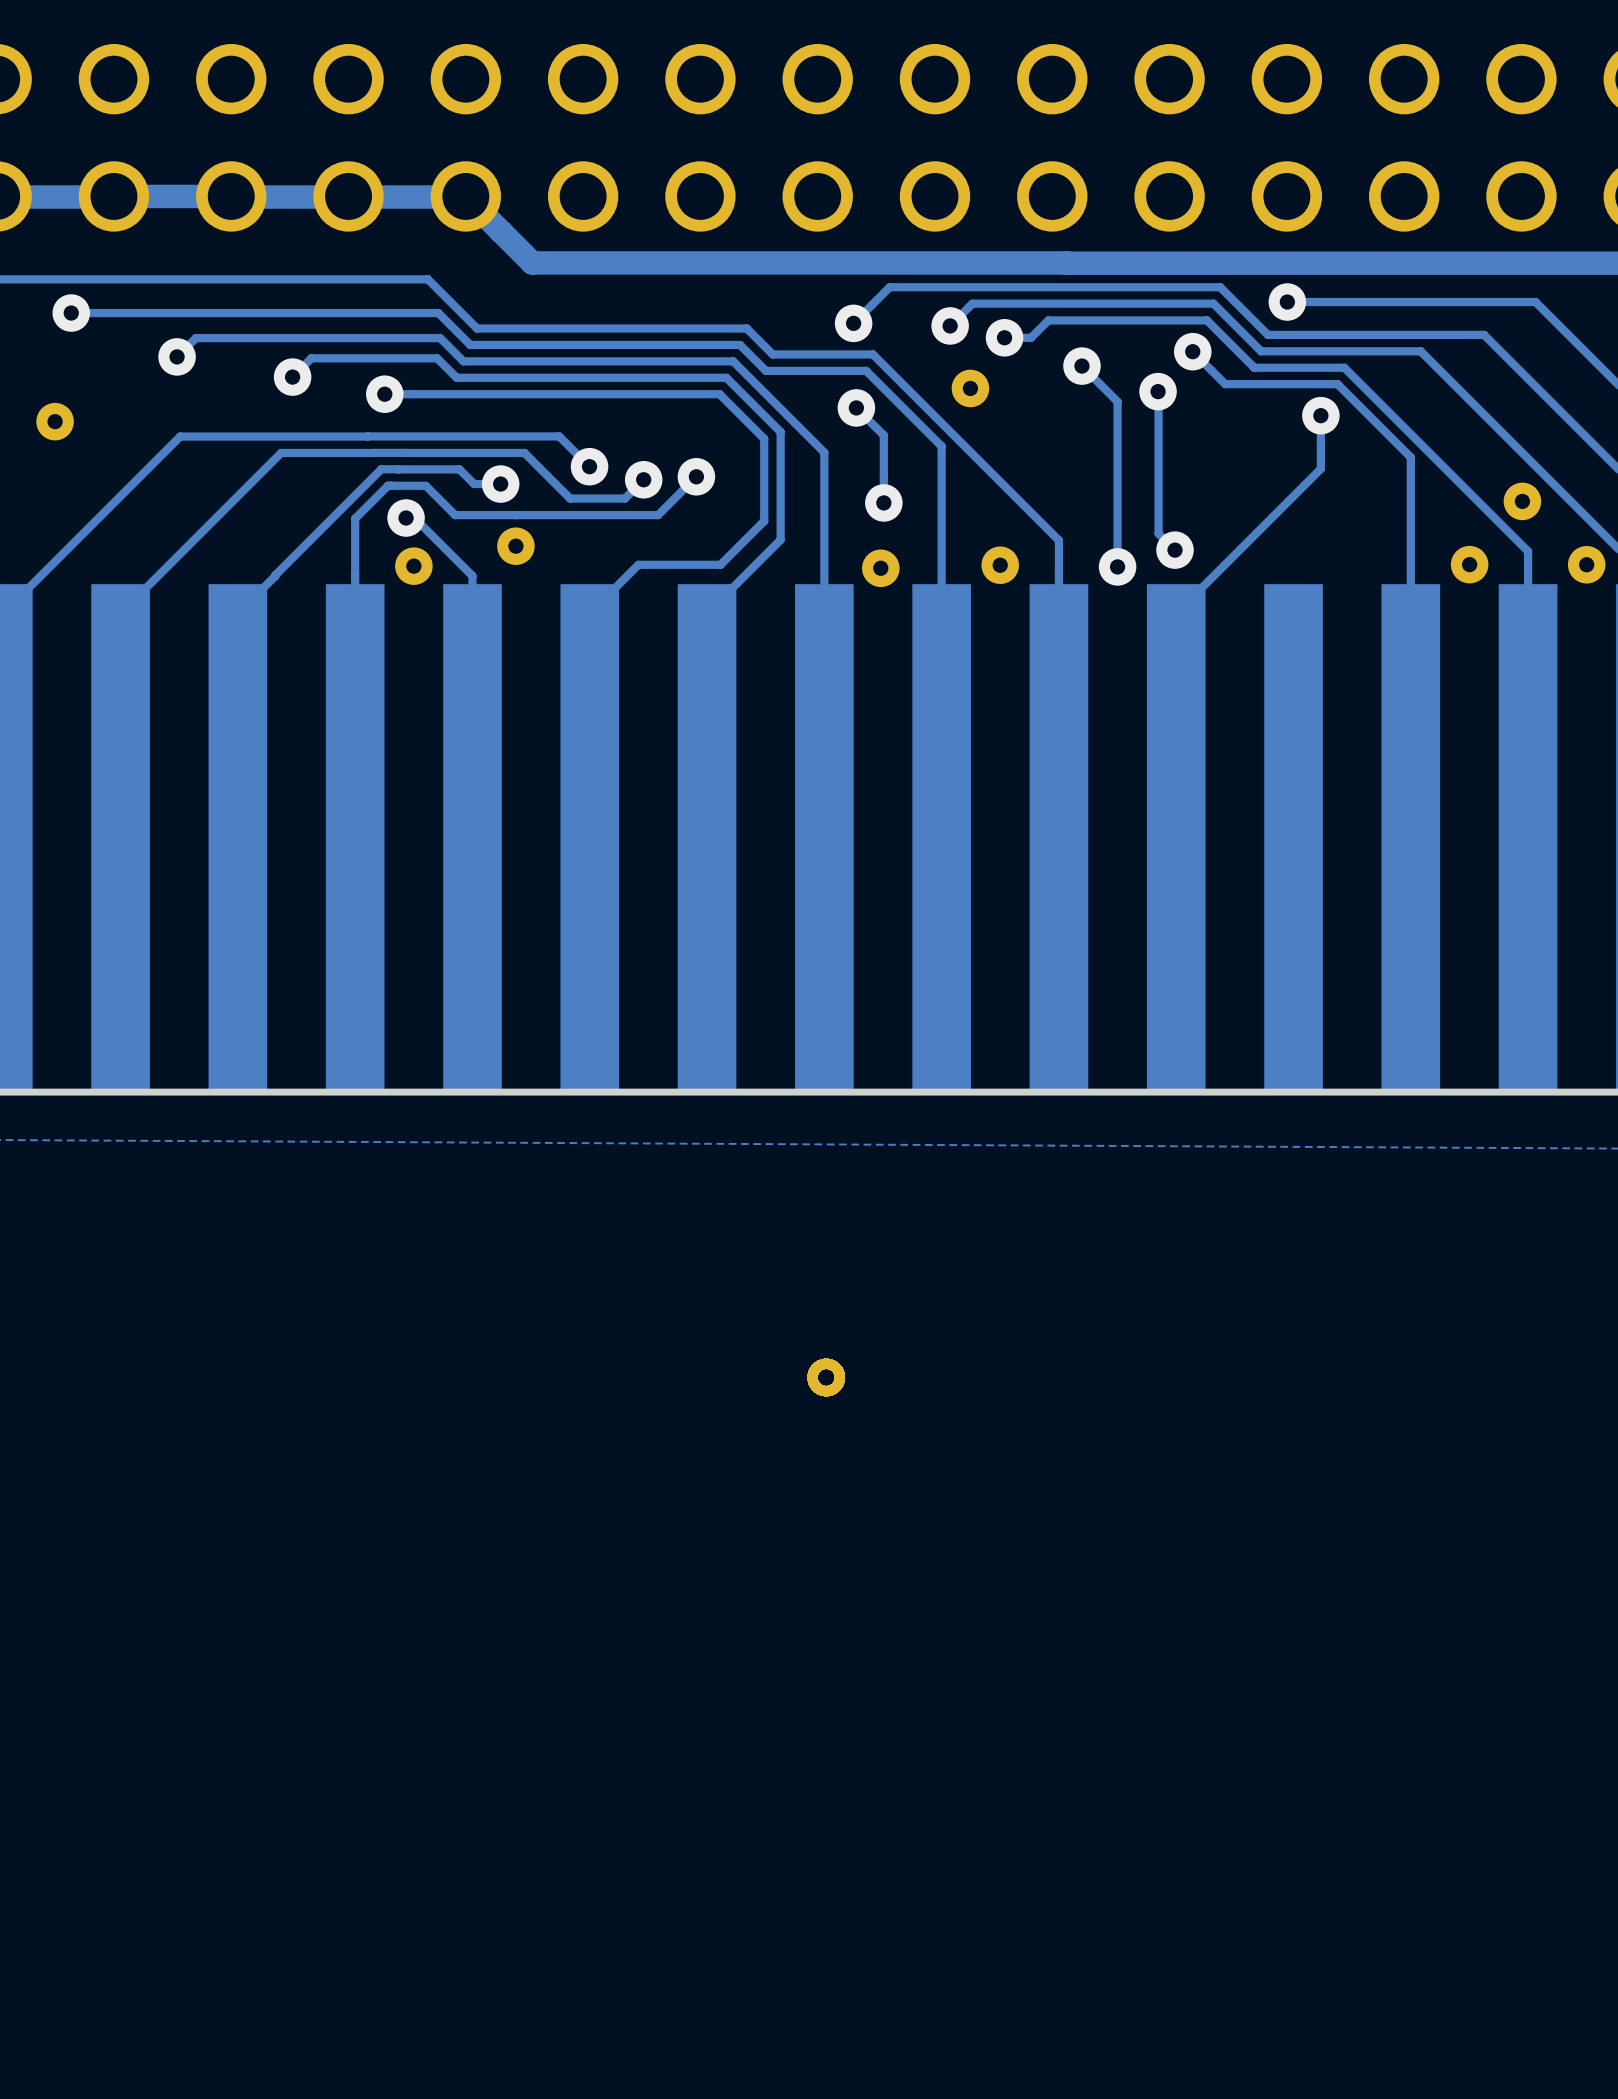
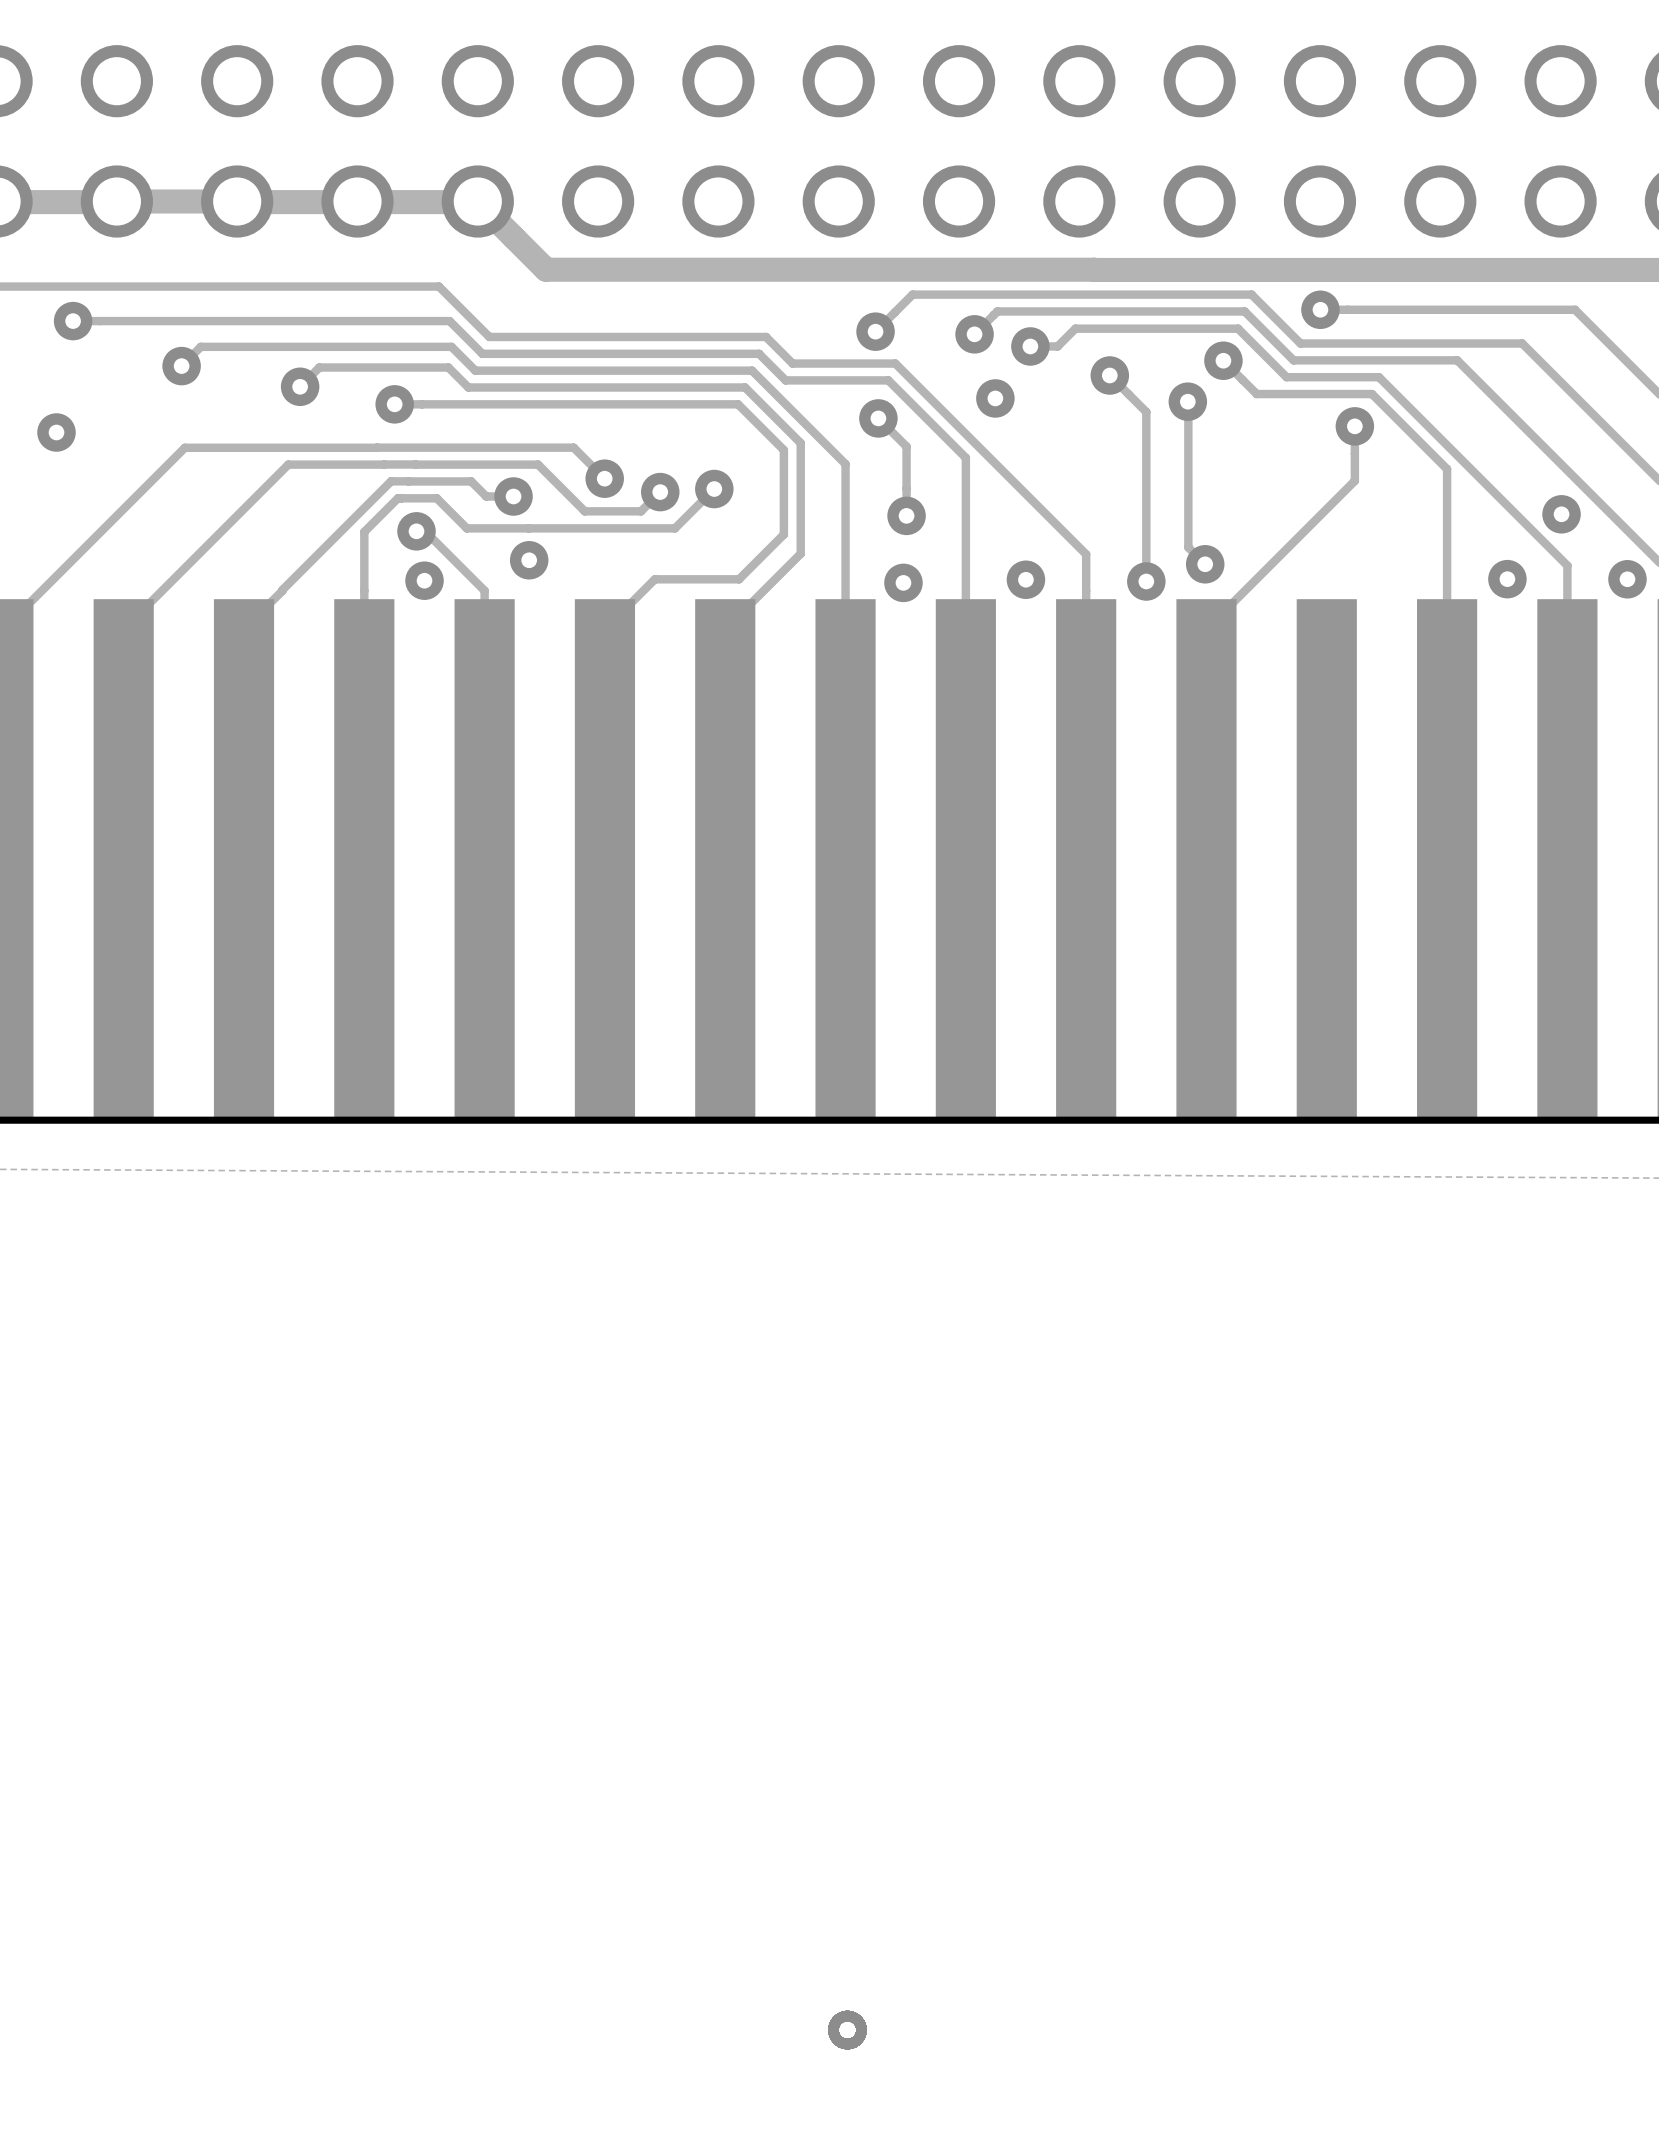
part position: (826, 1377) -> (847, 2030)

